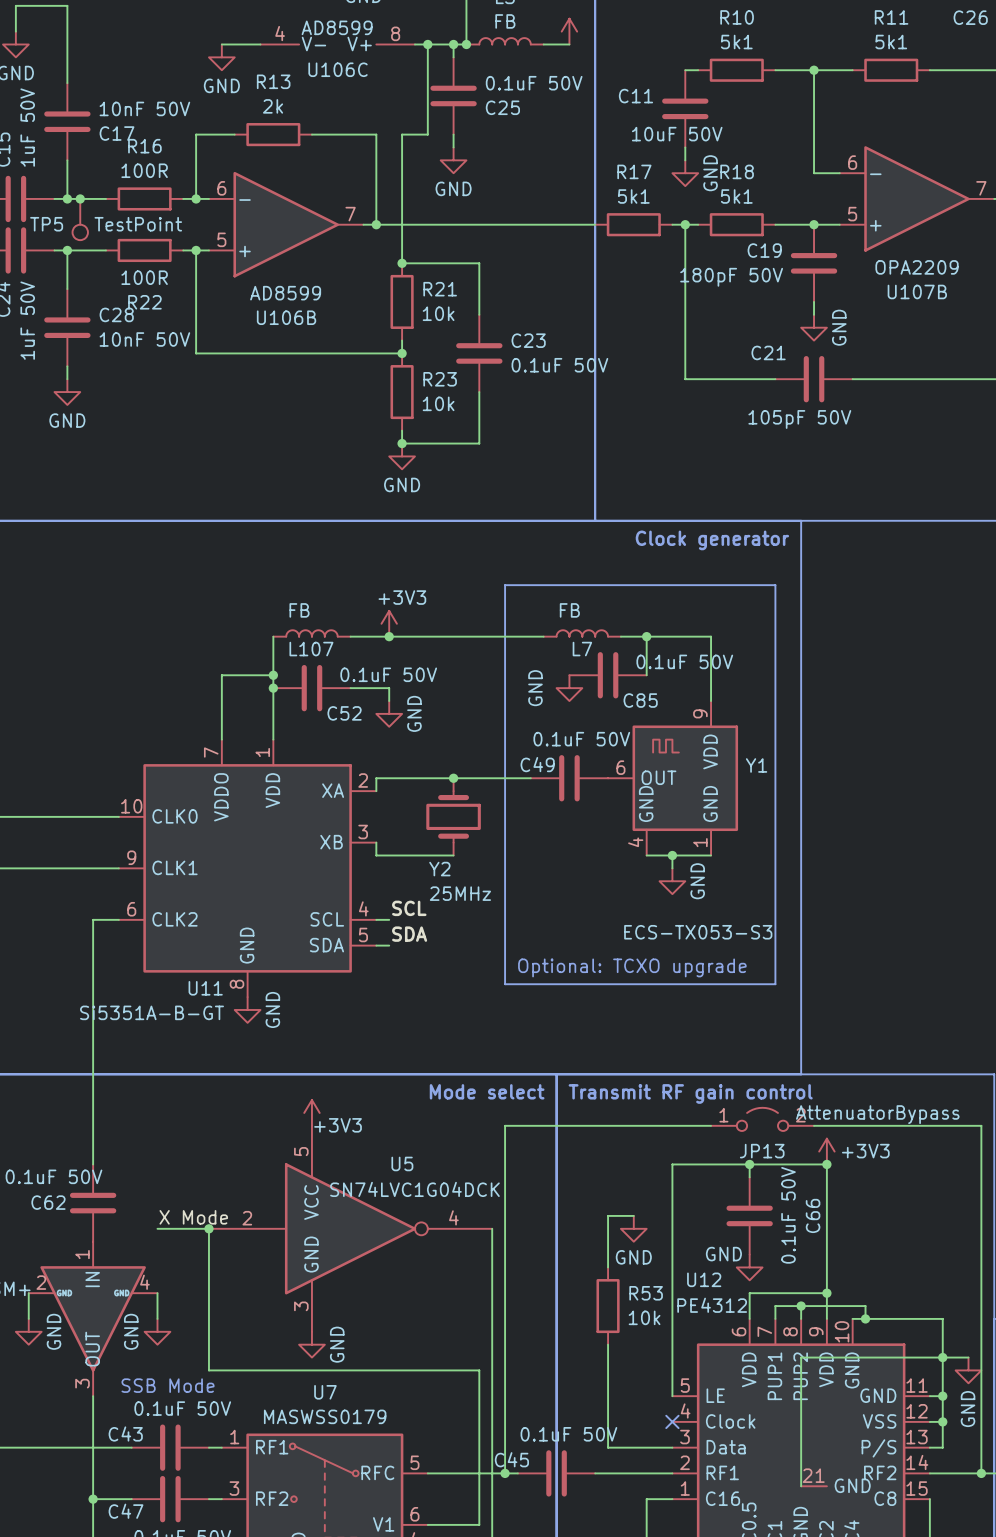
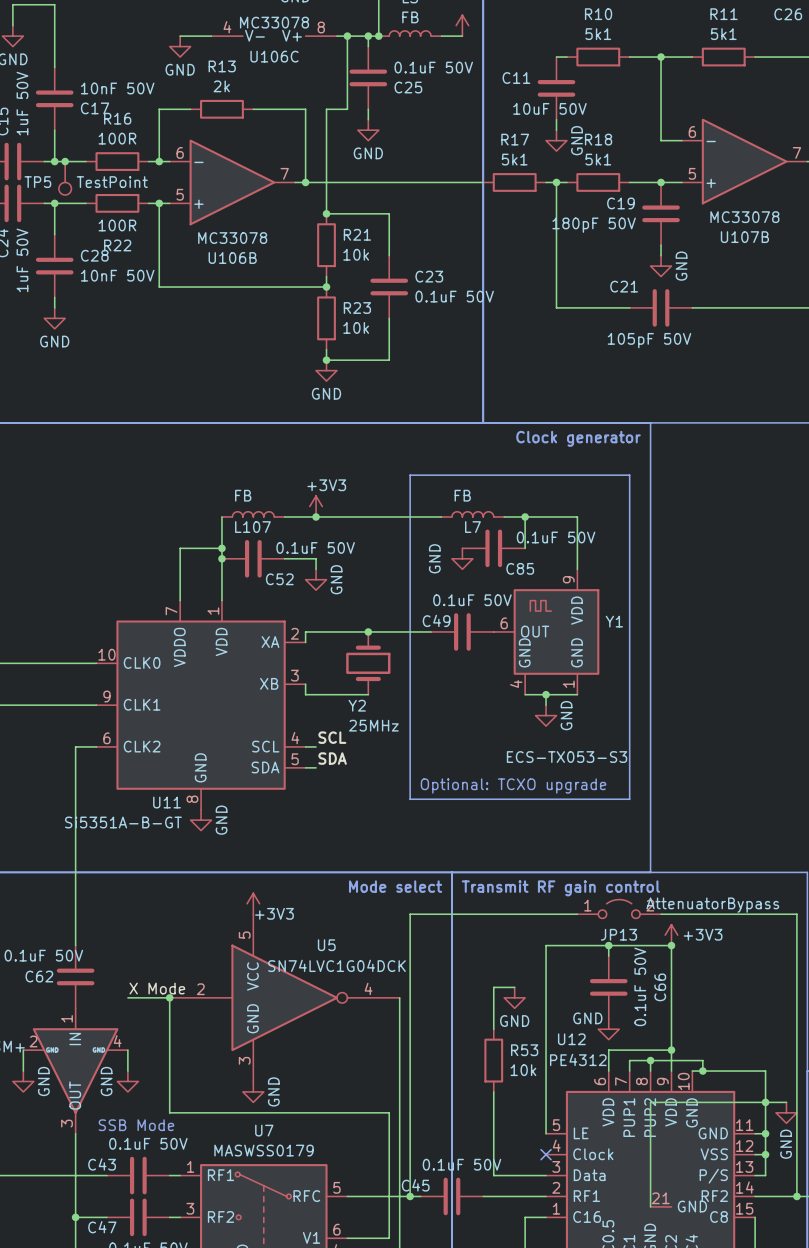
U106C value: AD8599 (337, 27) -> MC33078 (274, 22)
U107B value: OPA2209 (917, 267) -> MC33078 (744, 217)
U106B value: AD8599 (285, 293) -> MC33078 (232, 238)

